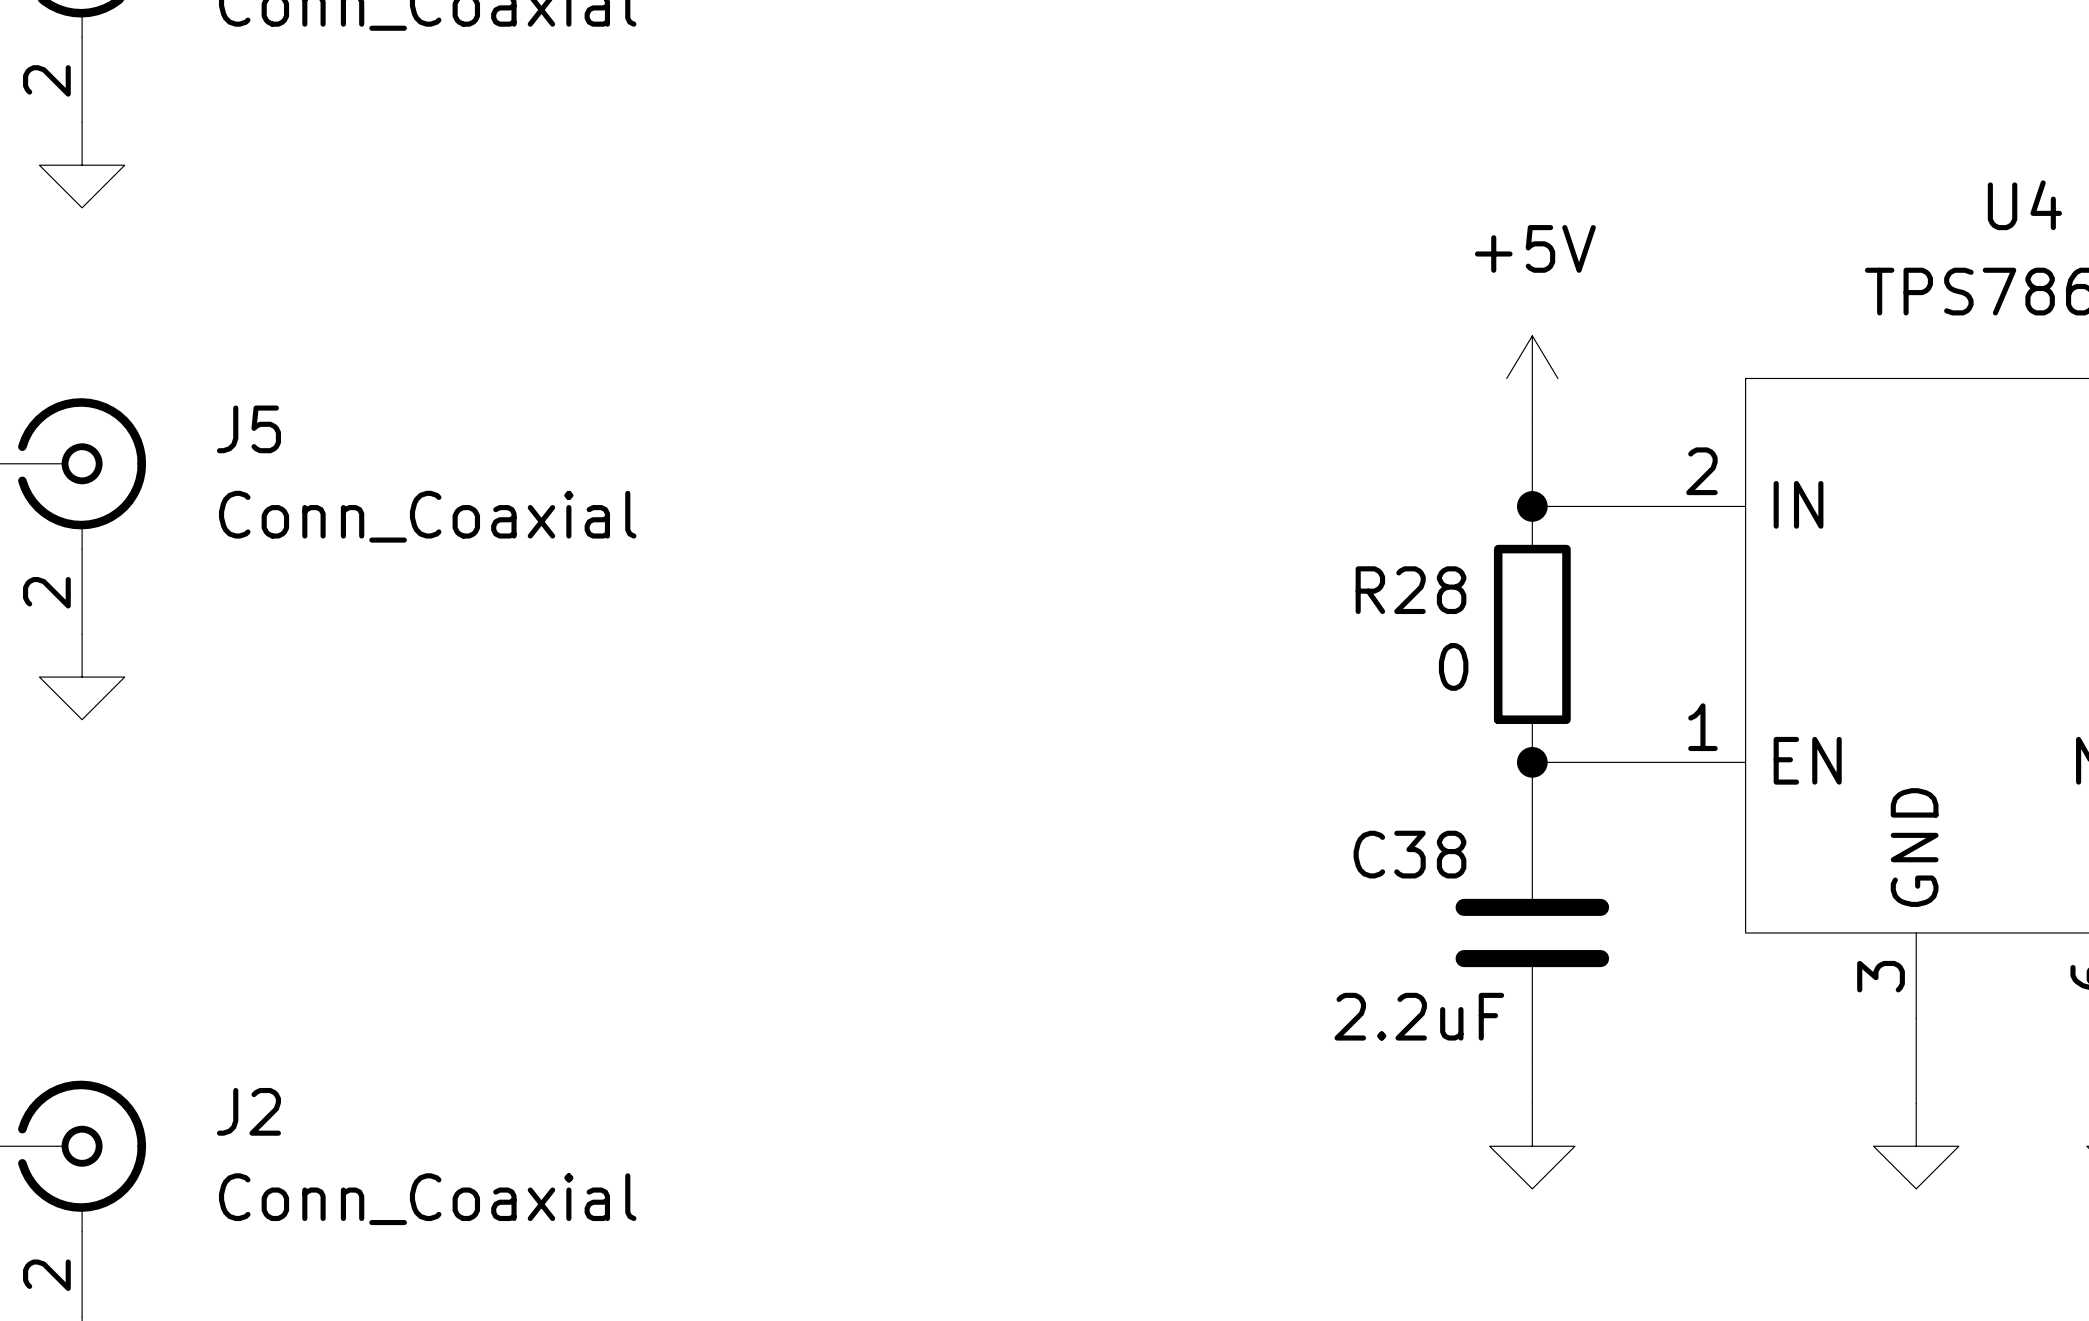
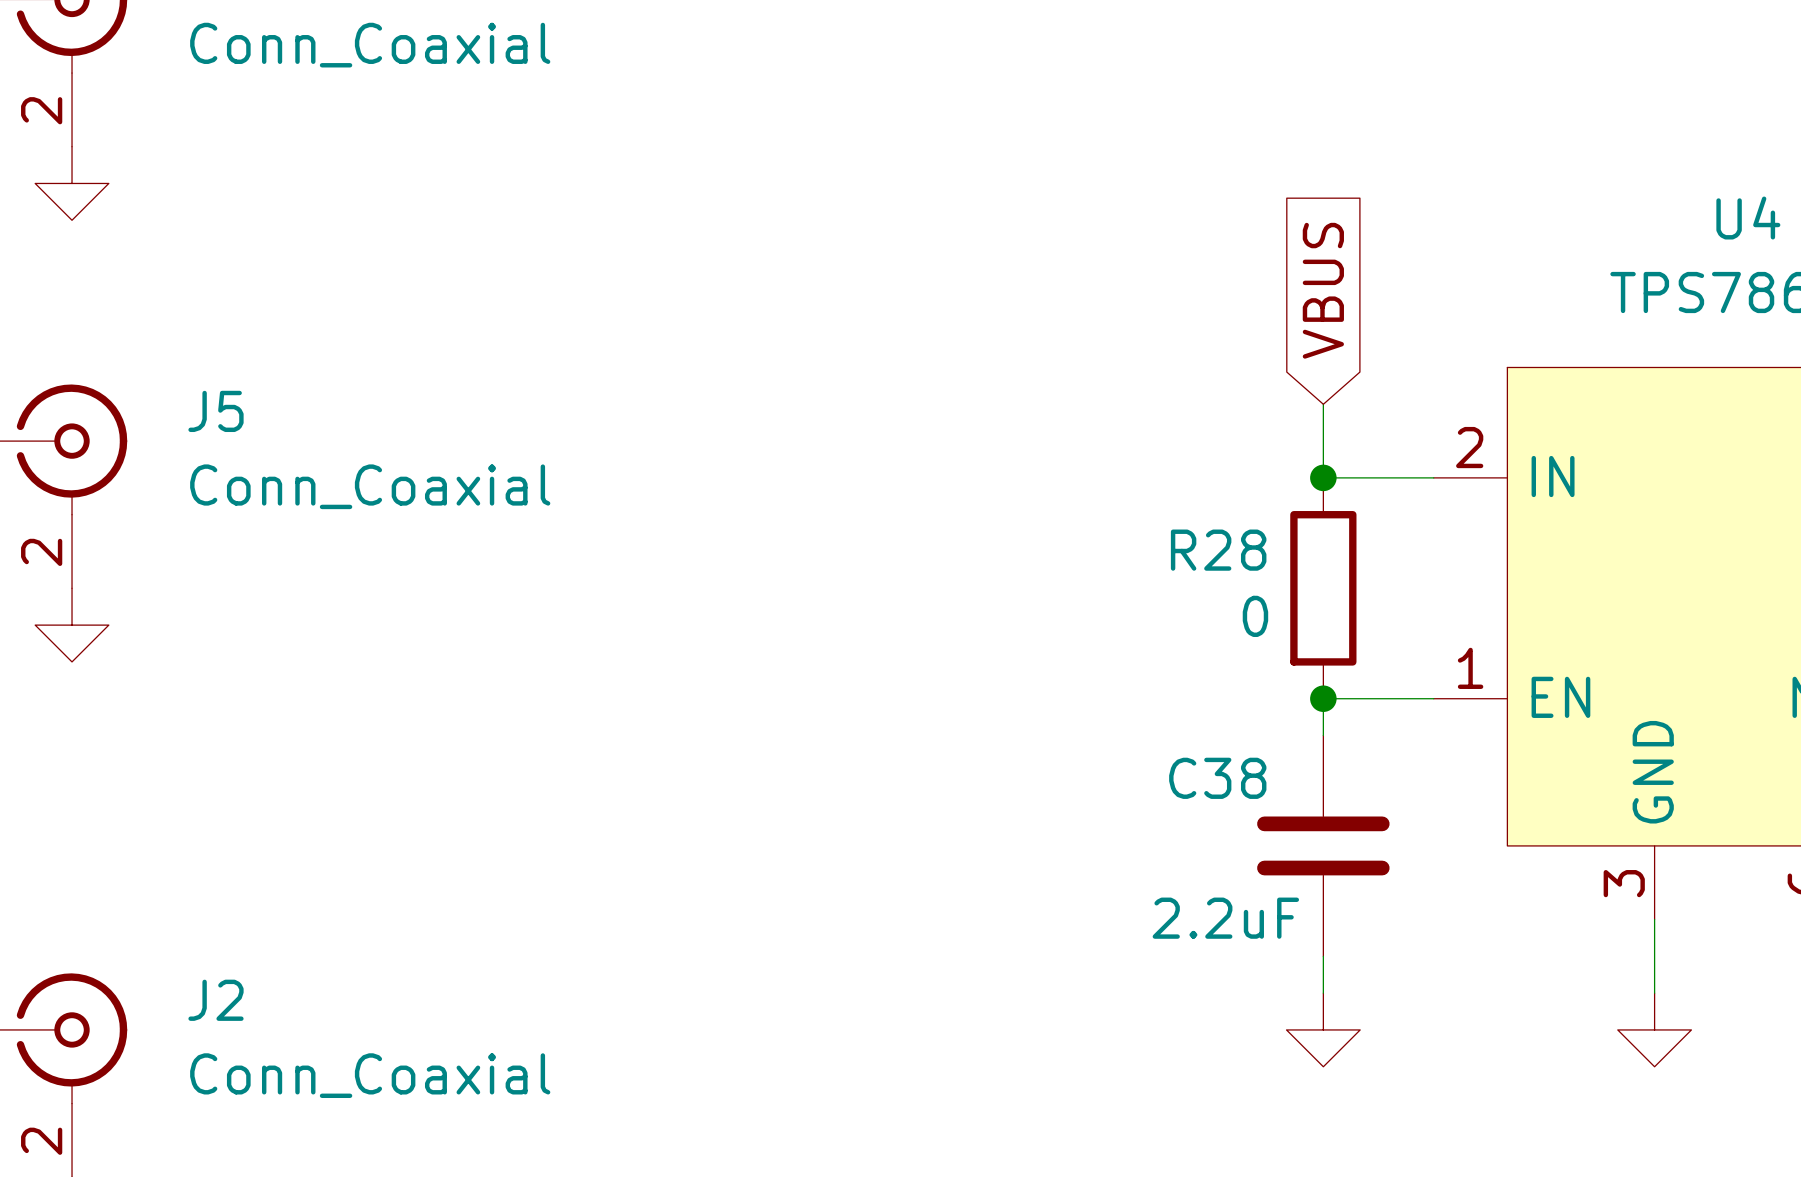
global label: none -> VBUS (1323, 290)
power symbol: +5V (1532, 378) -> none

